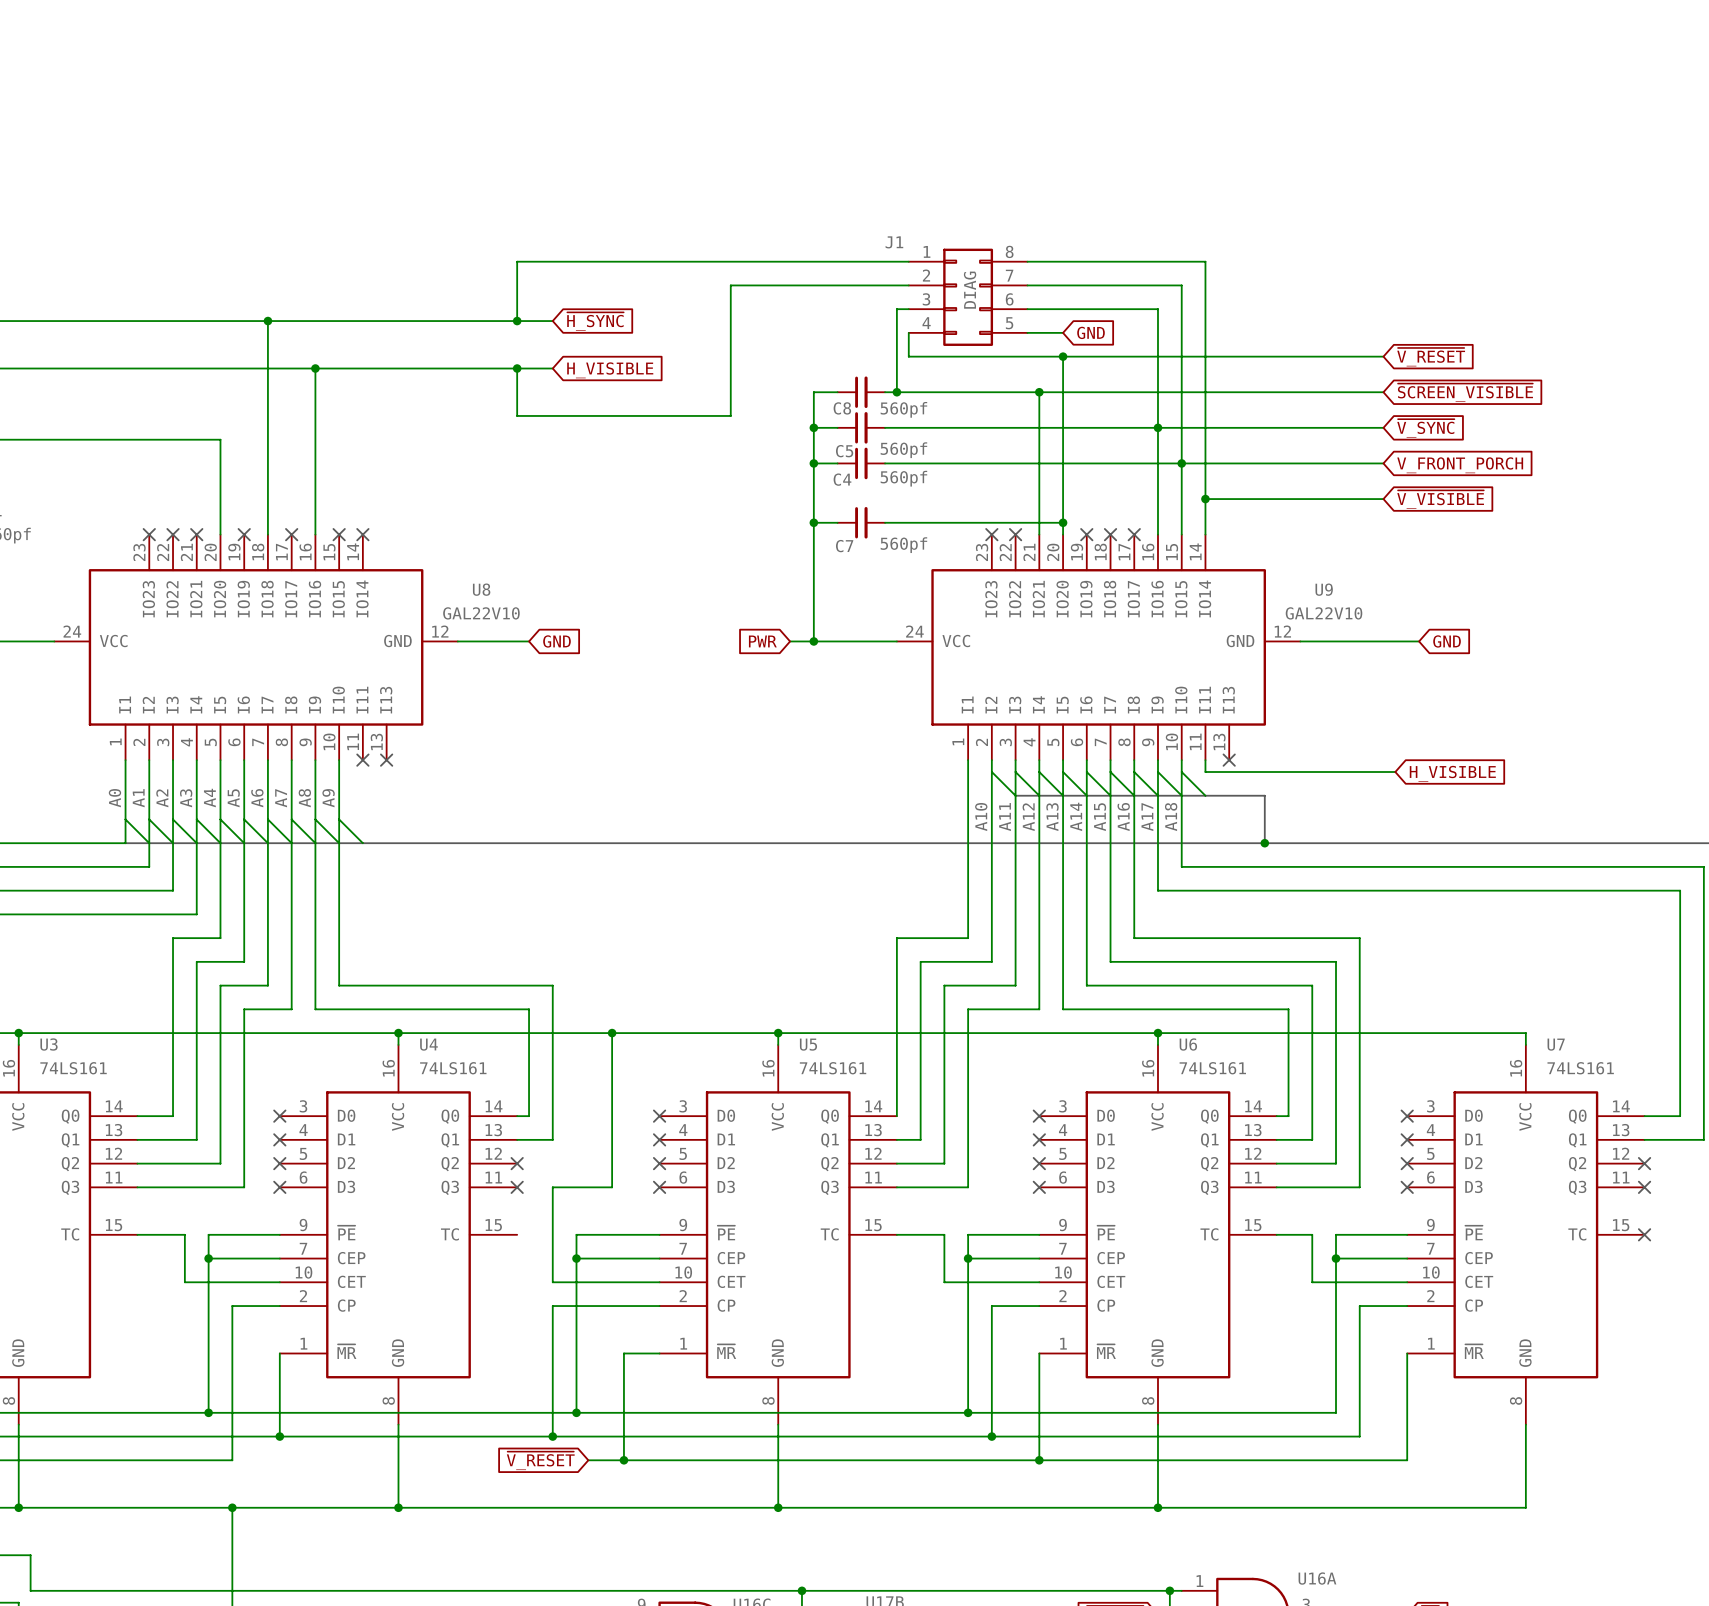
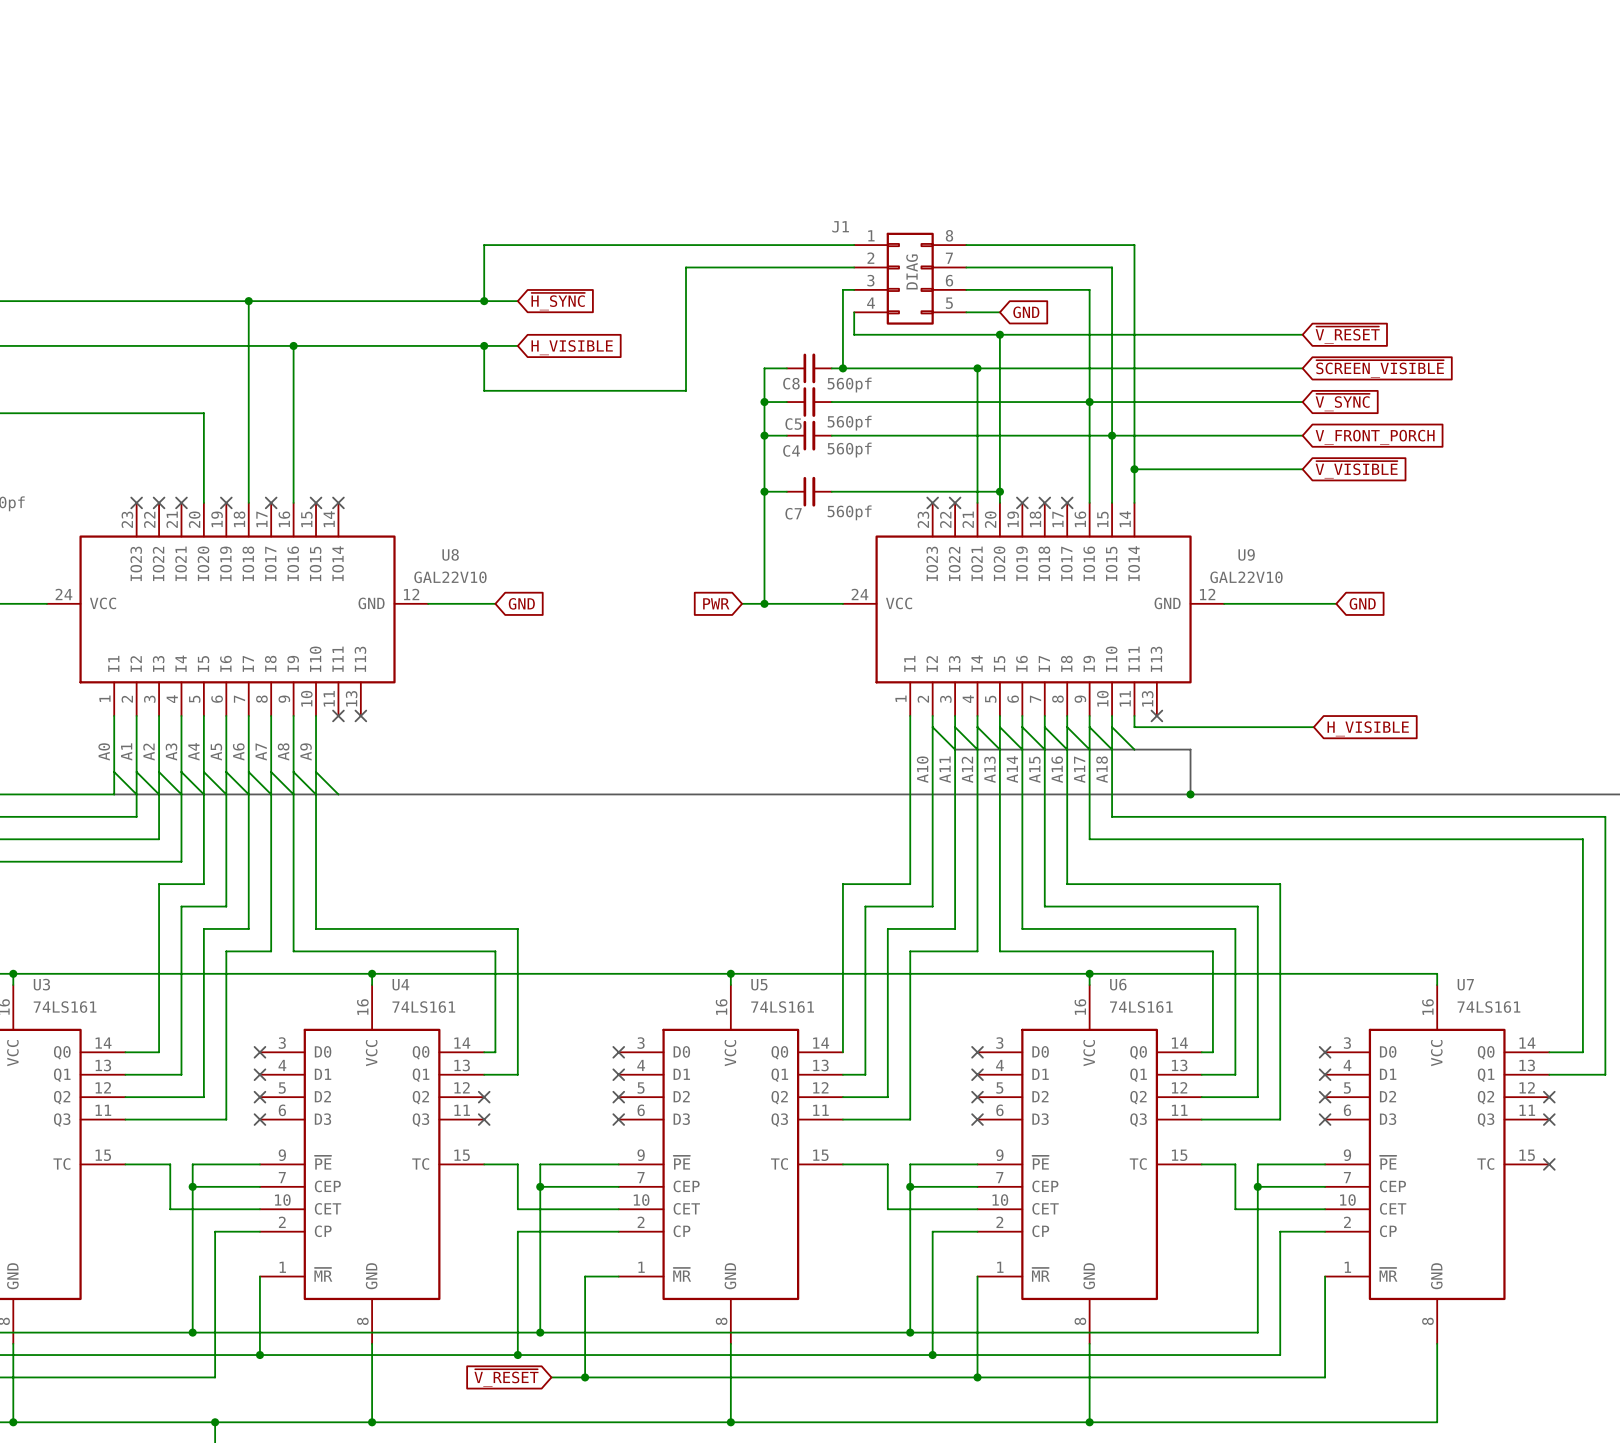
wire: (612, 1033) (612, 1187) (552, 1187) (552, 1234) -> (484, 1164) (517, 1164)
junction: (612, 1033) -> none

